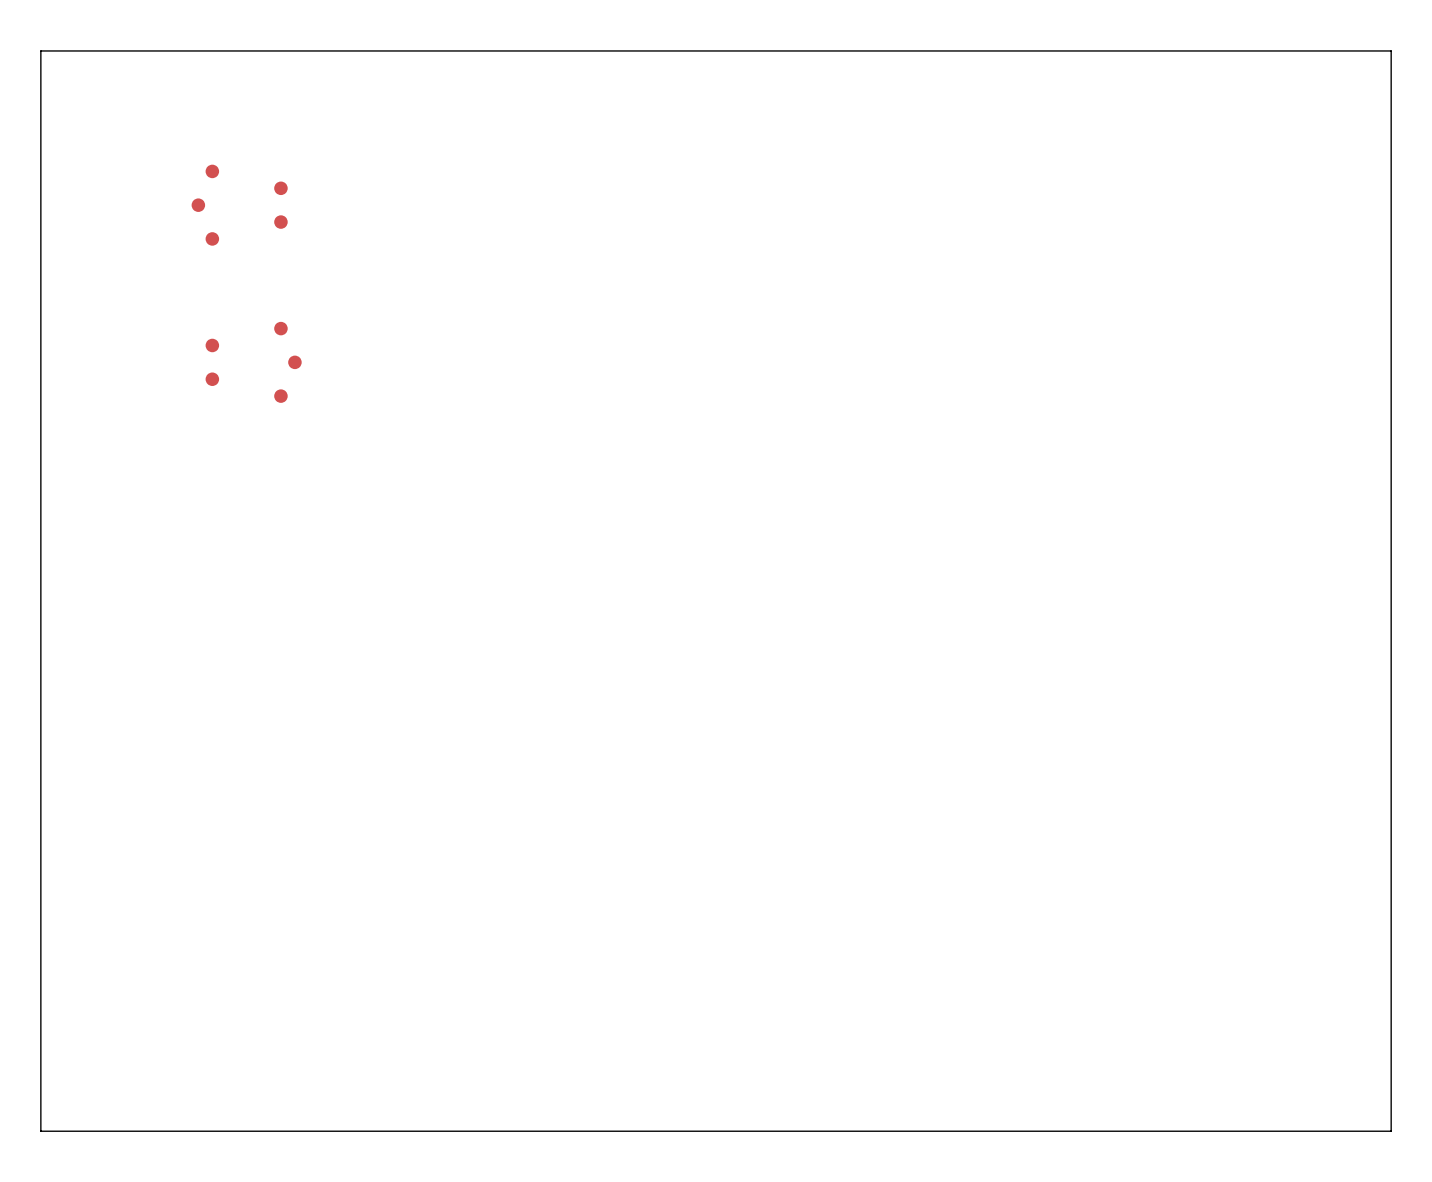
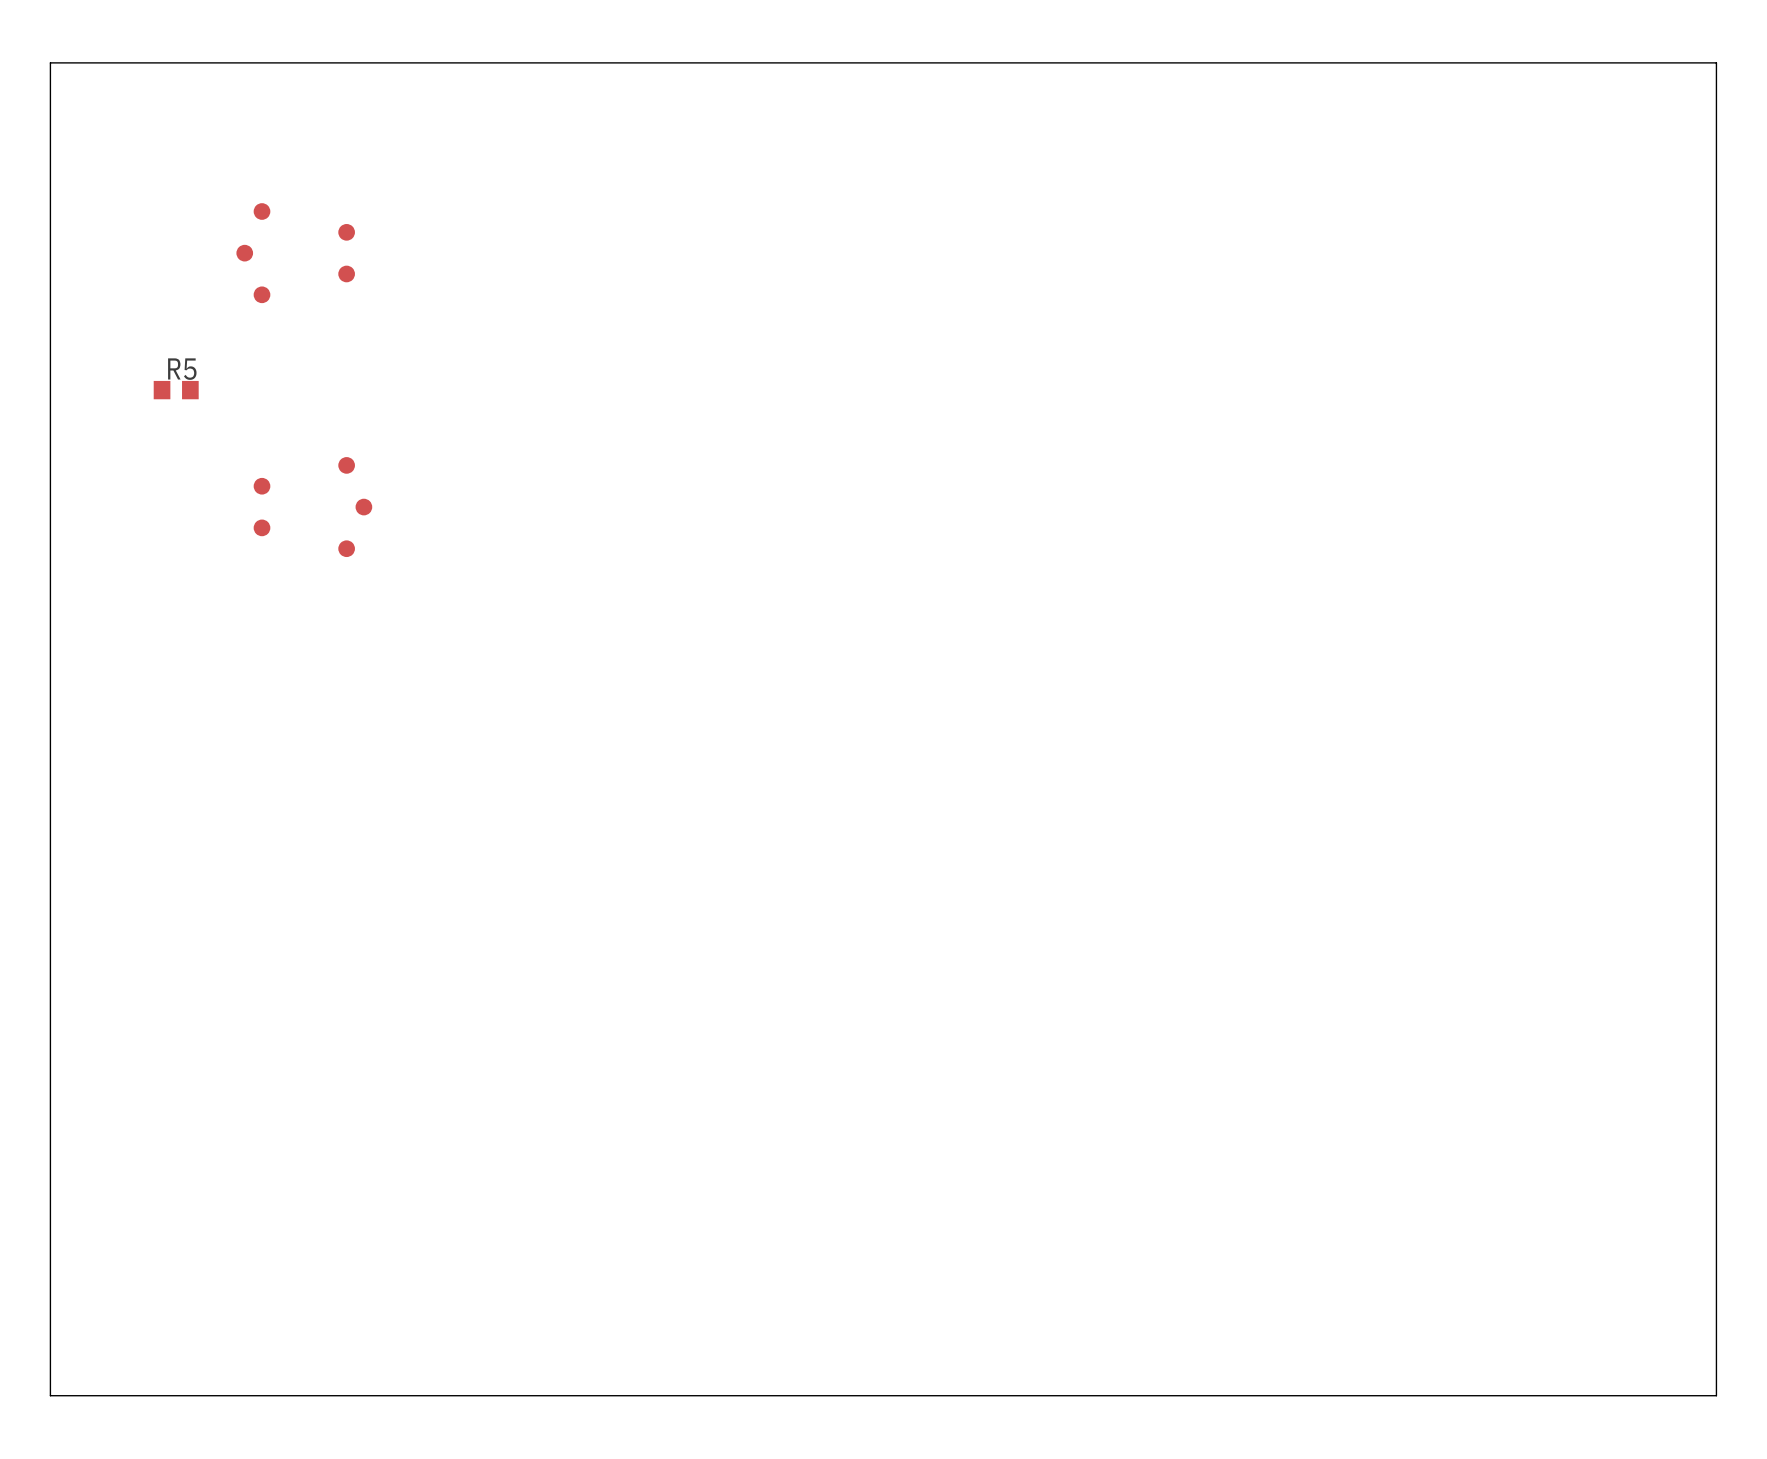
R5: none -> (176, 390)
part position: (212, 362) -> (262, 507)
part position: (287, 362) -> (355, 507)

